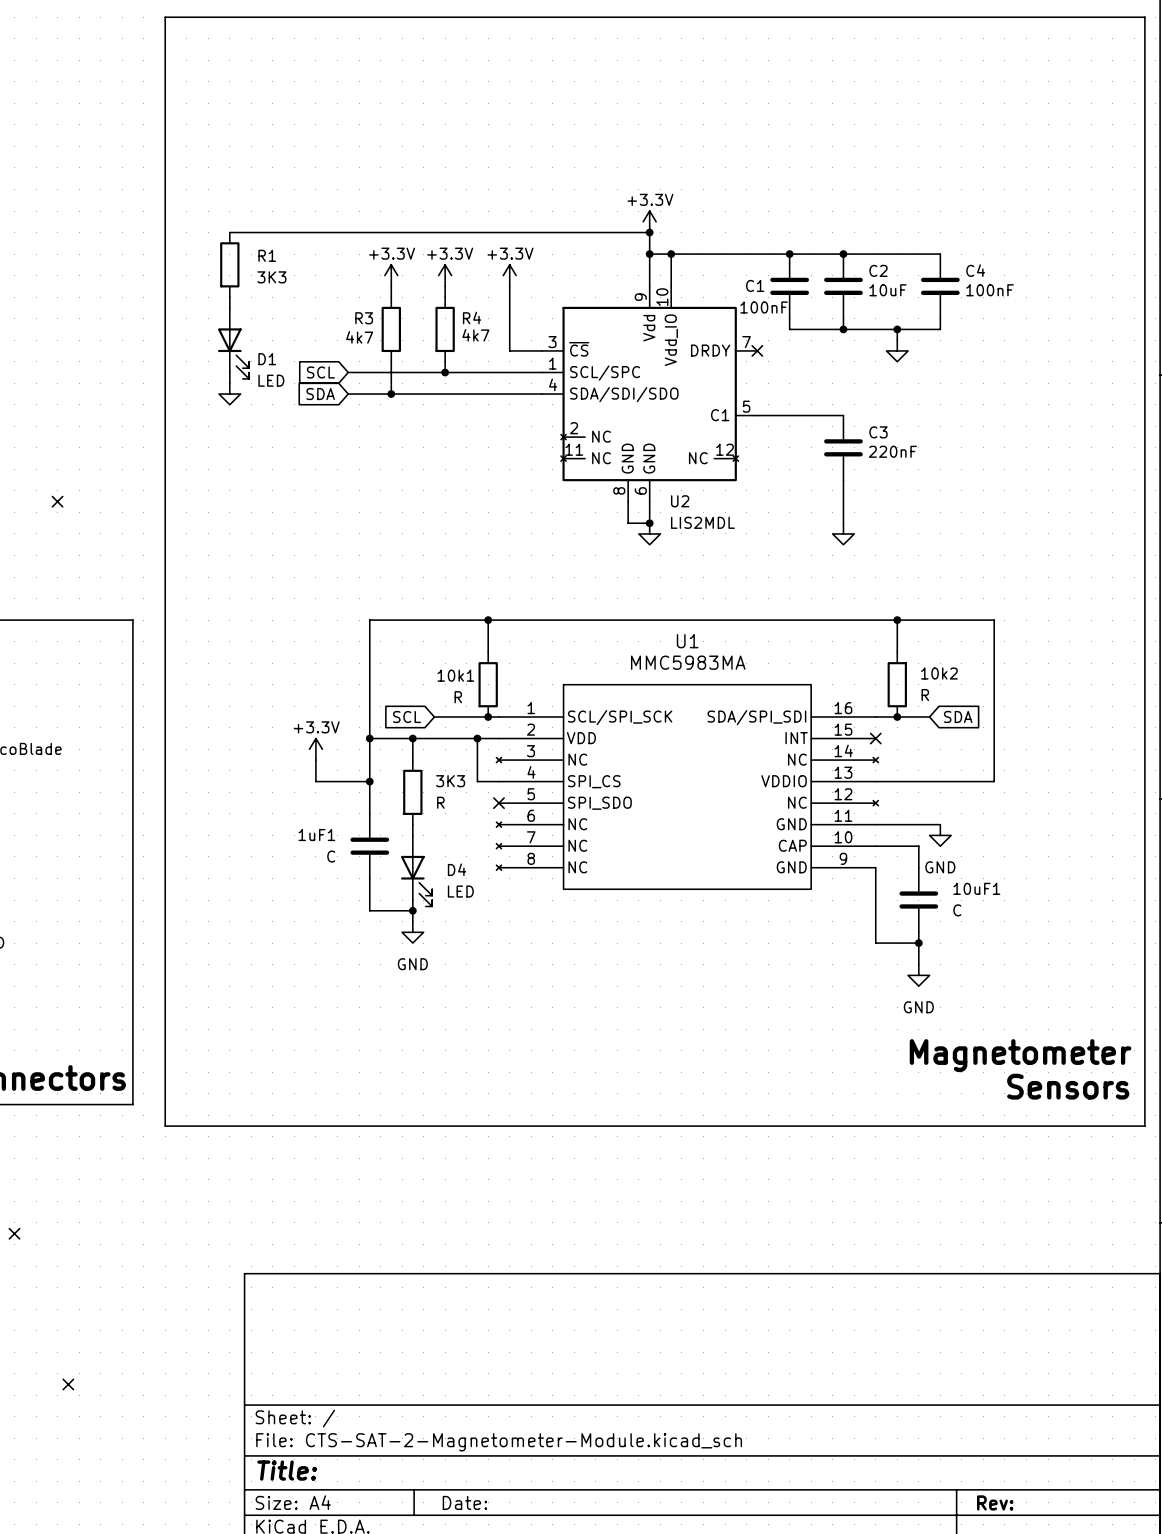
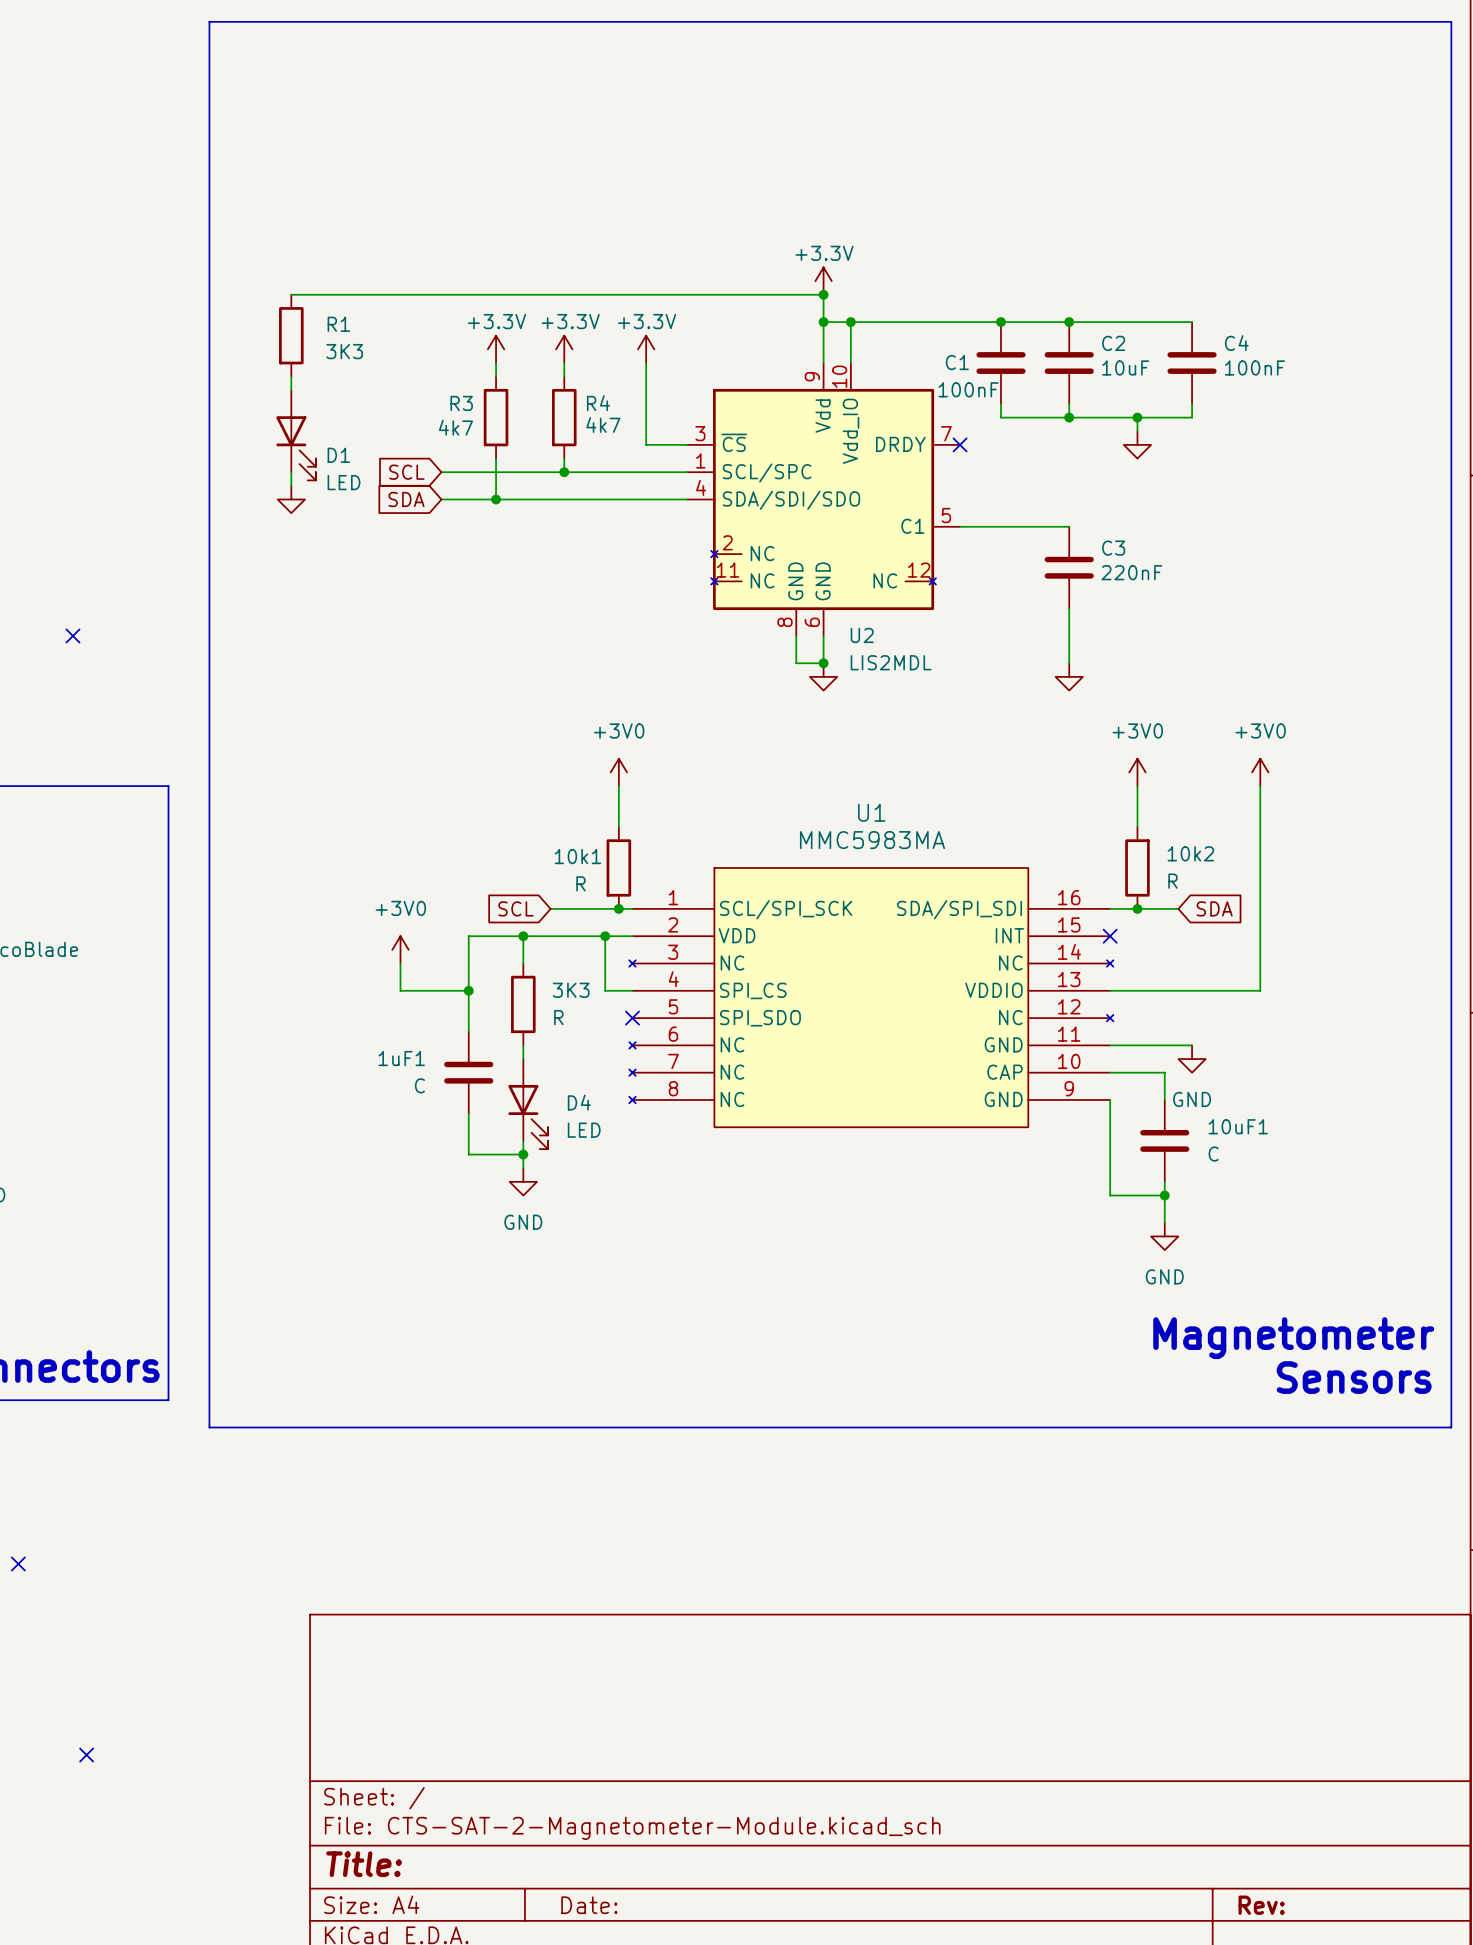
power symbol: none -> +3V0 (618, 772)
power symbol: none -> +3V0 (1137, 772)
power symbol: none -> +3V0 (1260, 772)
junction: (488, 620) -> none
junction: (897, 620) -> none
wire: (994, 620) (369, 620) (369, 738) -> none
junction: (369, 738) -> none
power symbol: +3.3V (315, 749) -> +3V0 (400, 949)

